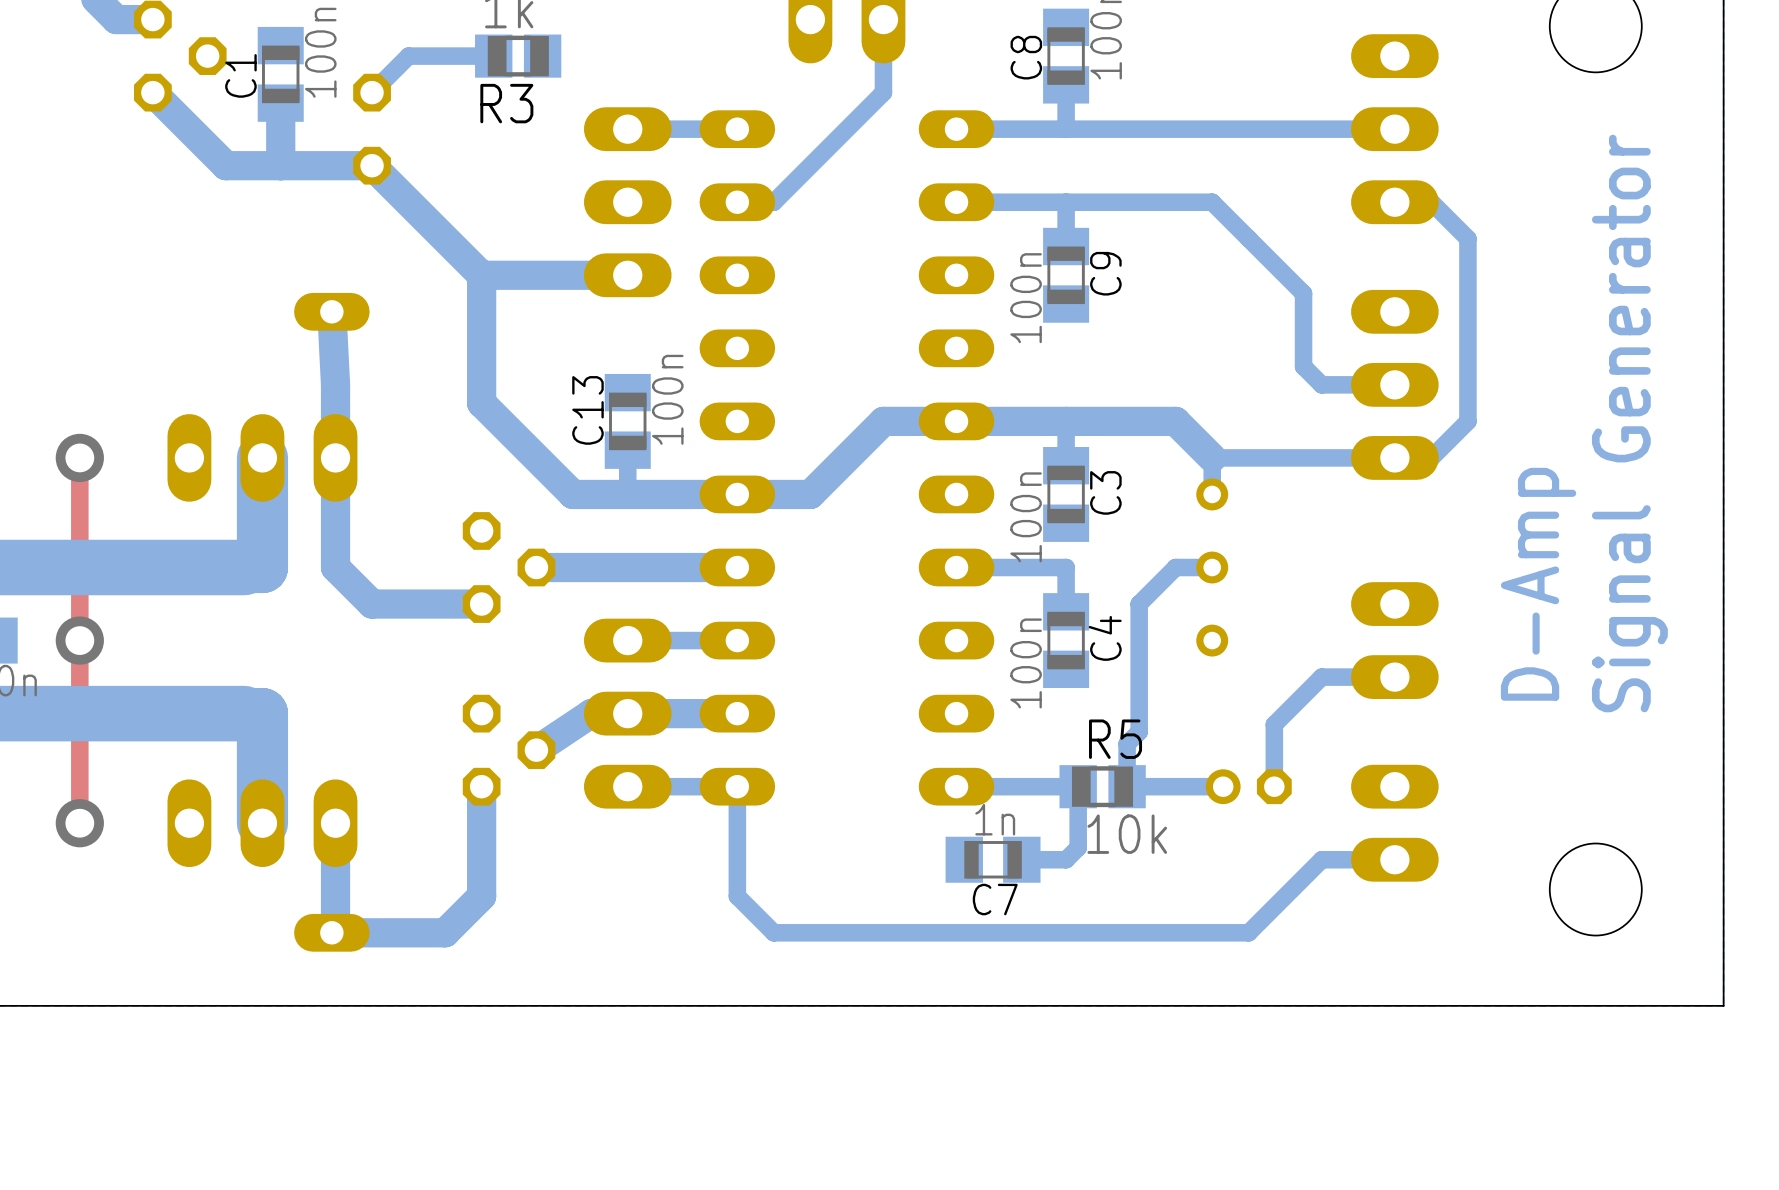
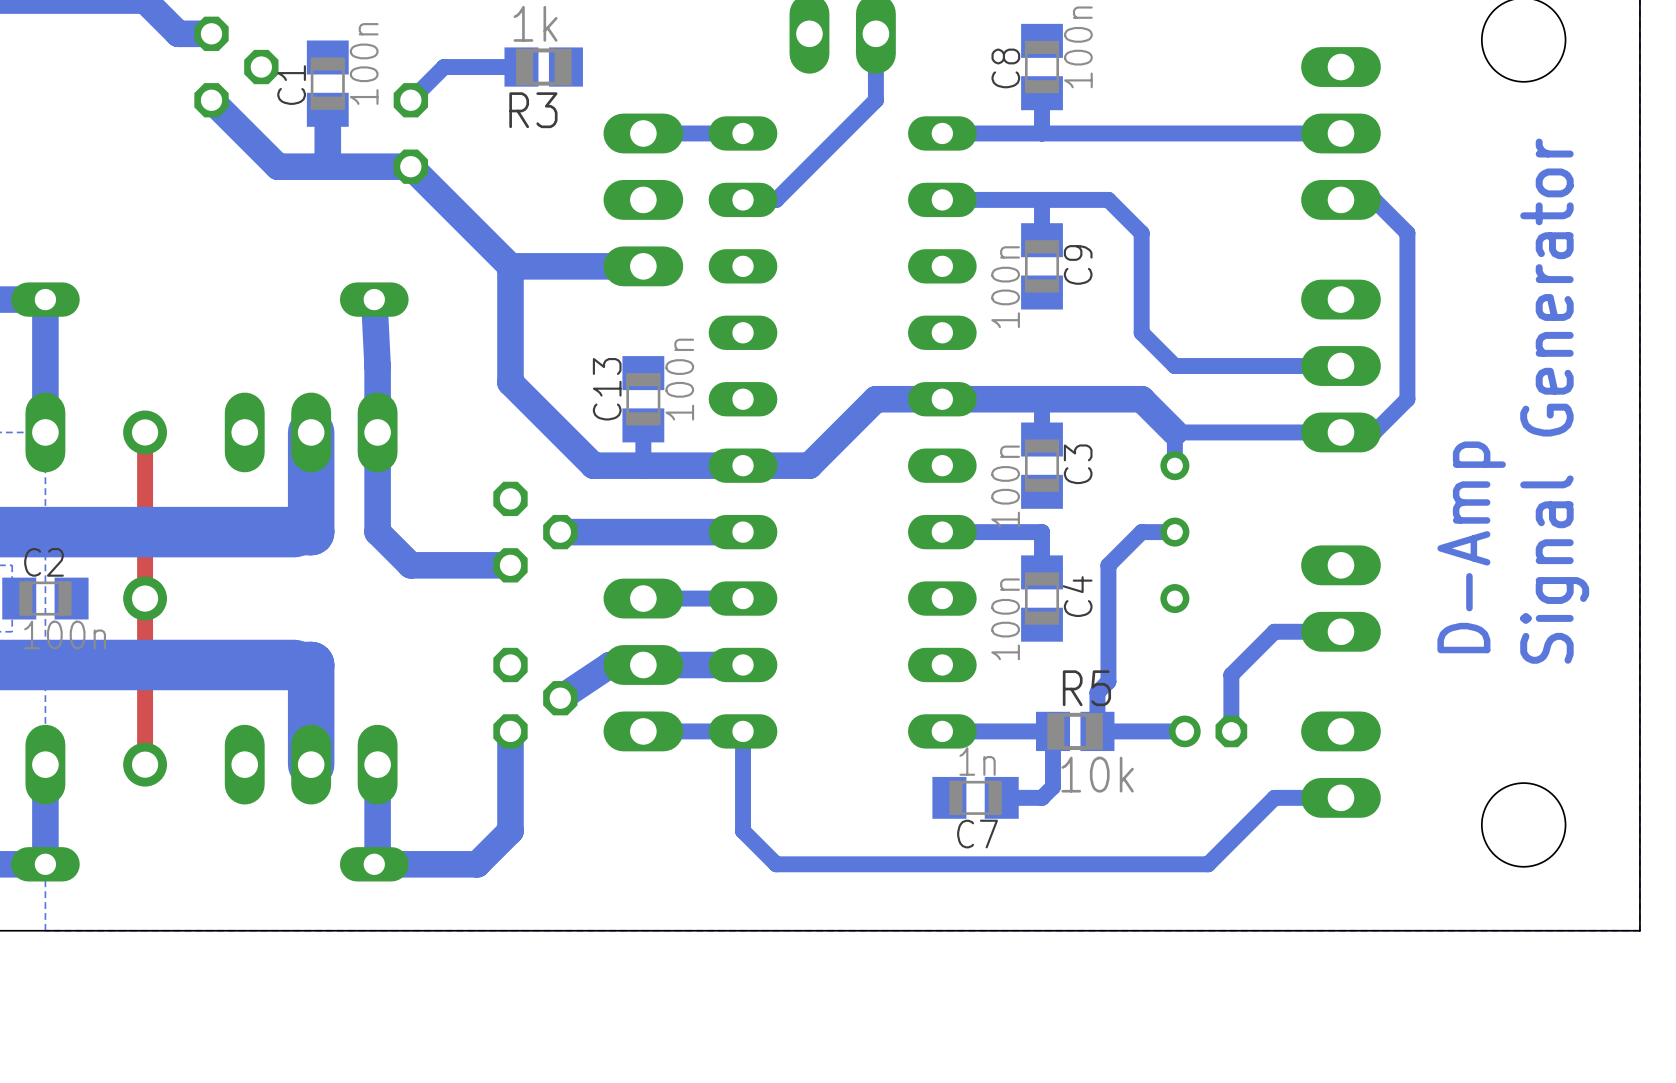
bottom track: (1139, 202) (1212, 202) (1303, 293) (1303, 366) (1321, 384) -> (1108, 199) (1141, 233) (1141, 332) (1174, 366) (1274, 366)

